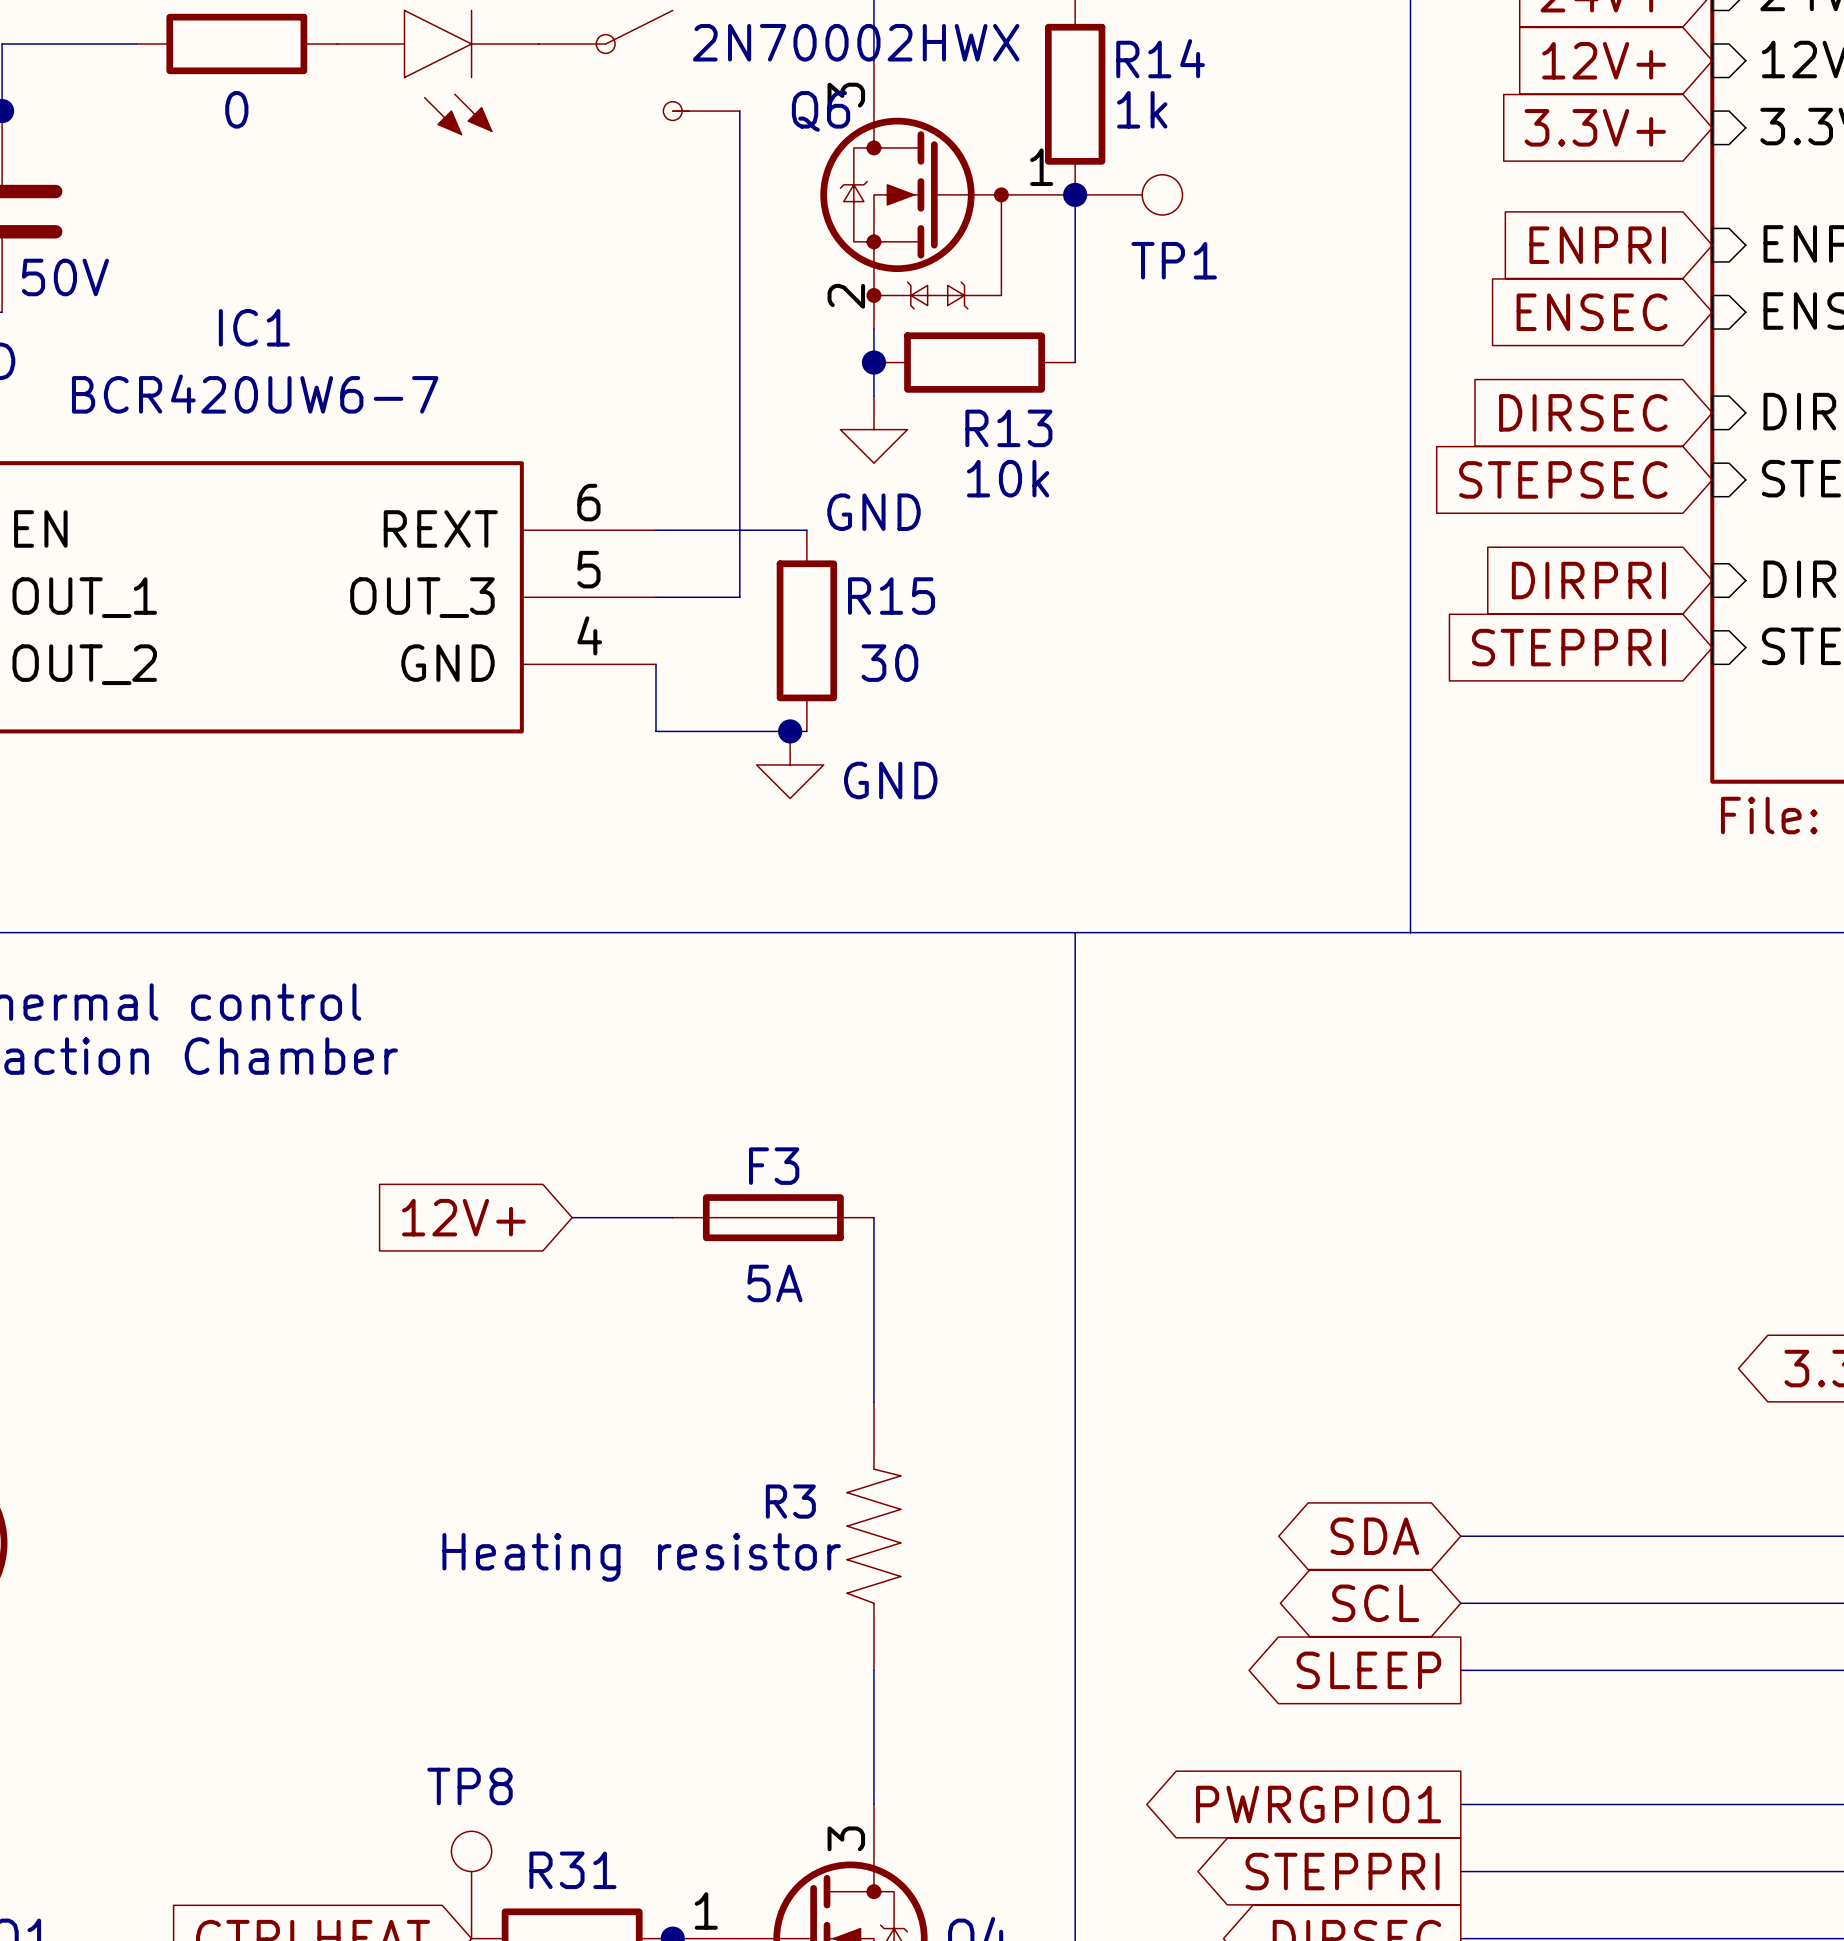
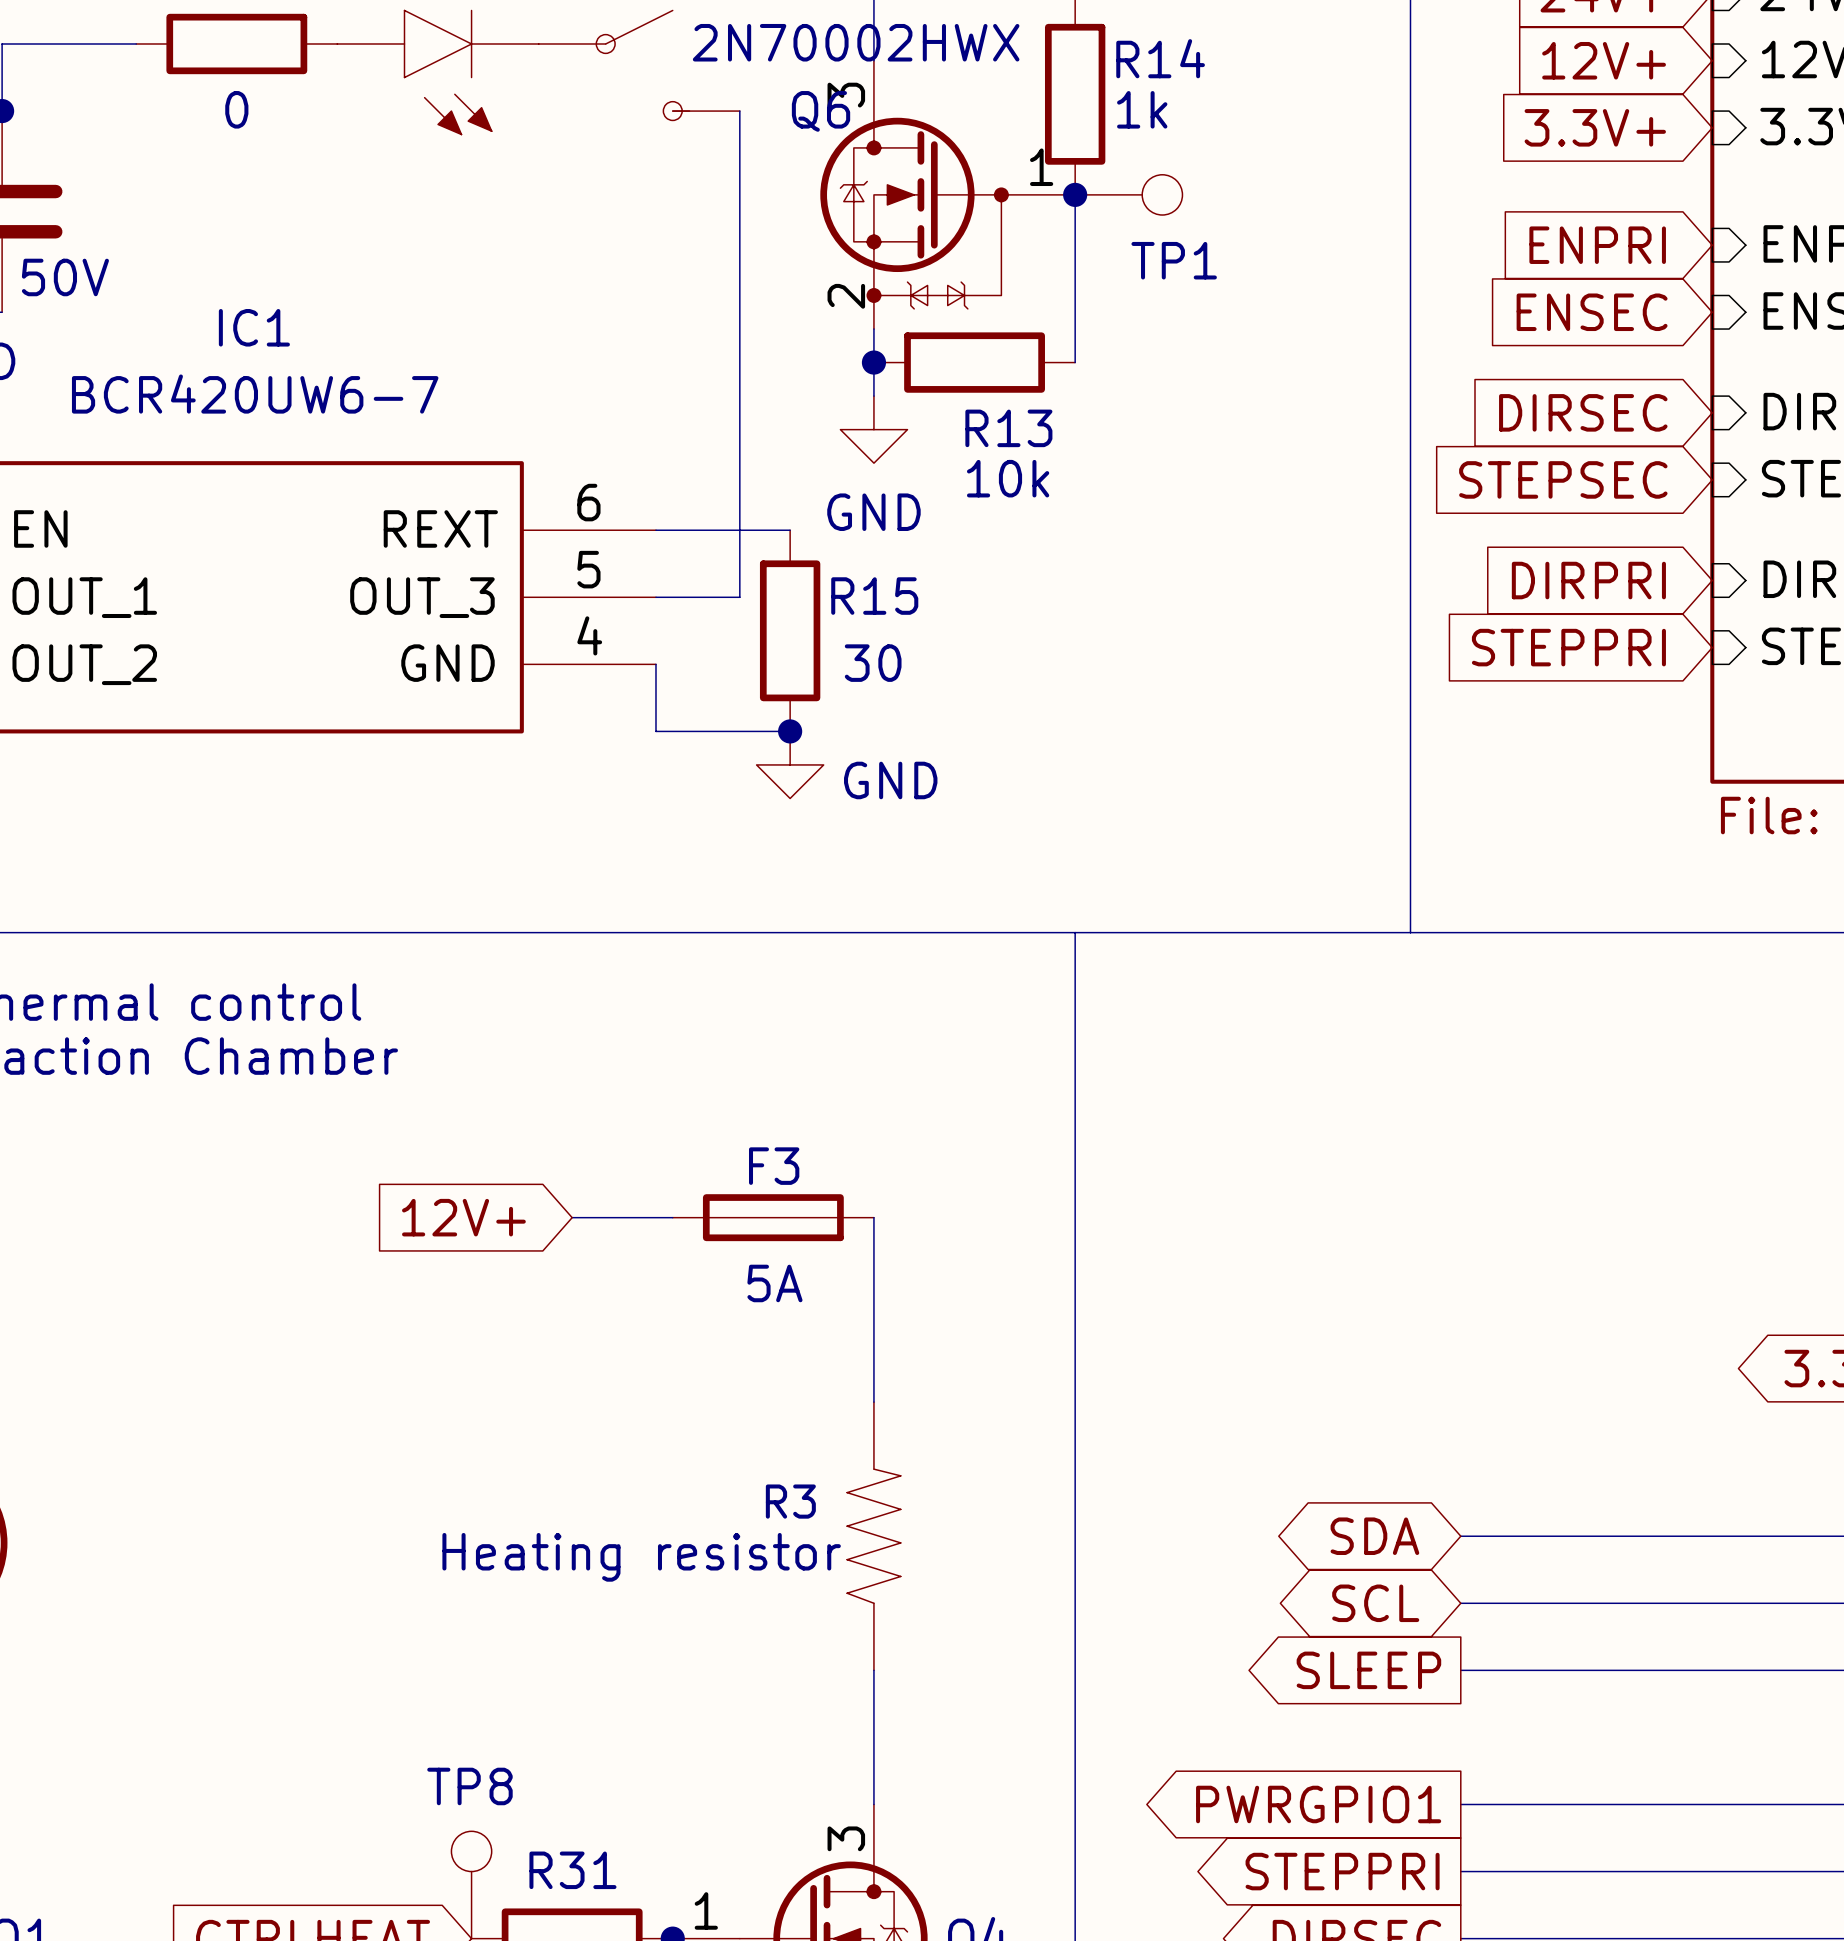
wire: (790, 530) (806, 530) -> none
R15 position: (806, 630) -> (790, 630)

